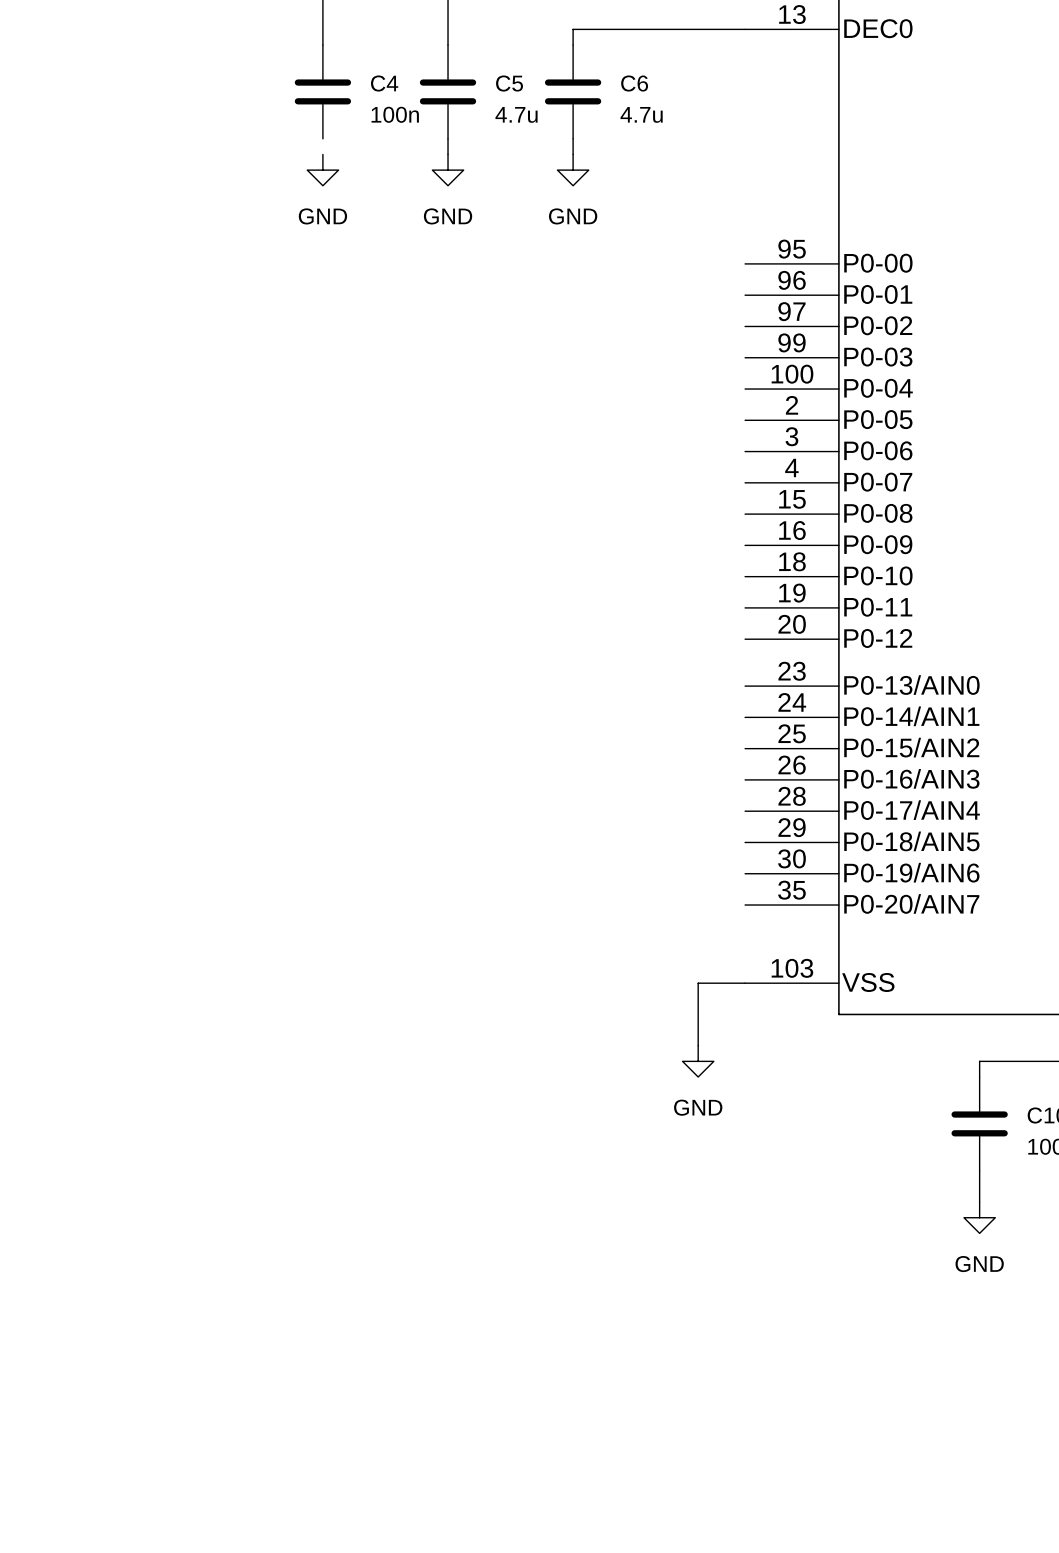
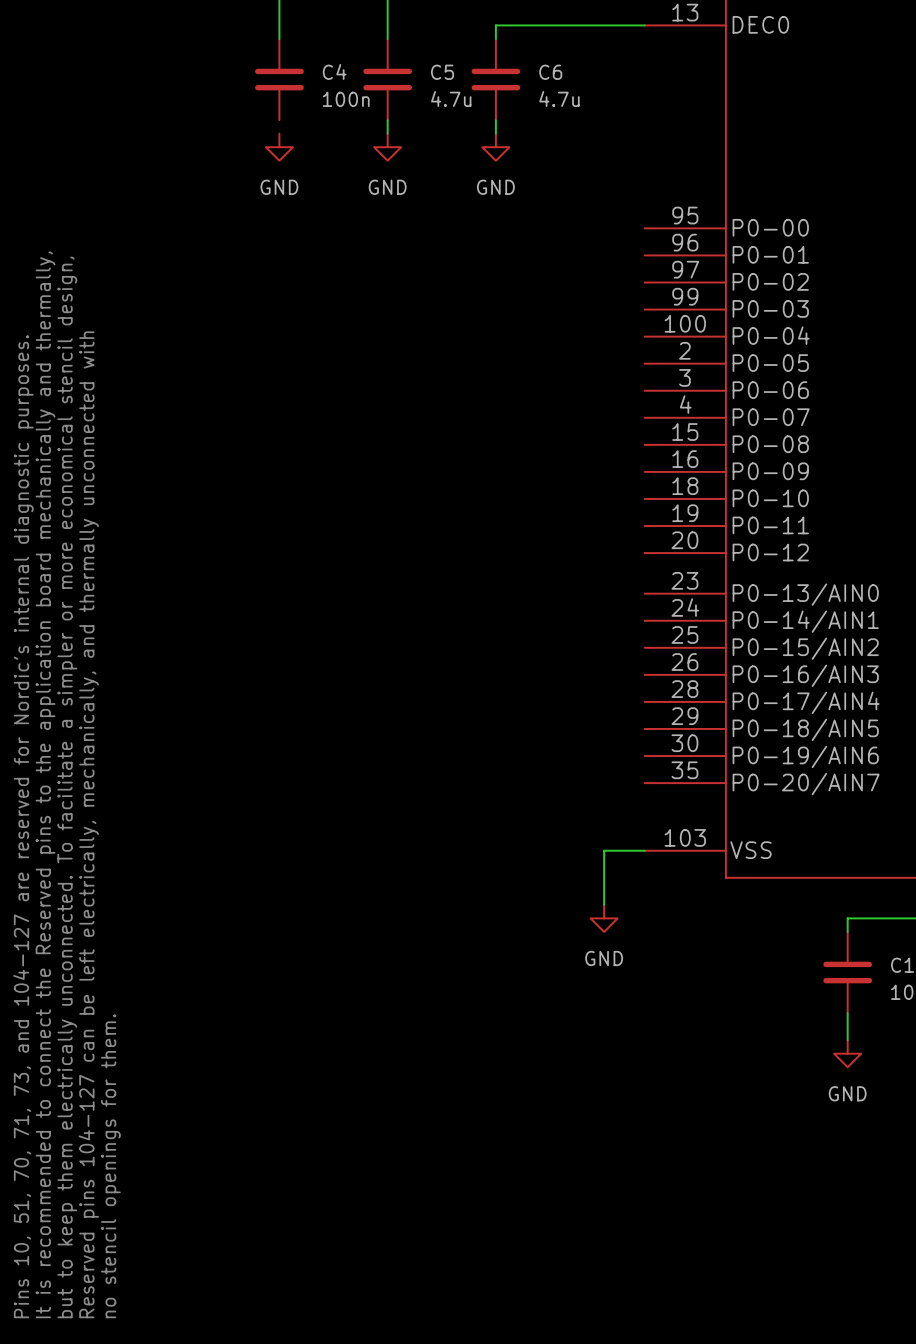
text: none -> It is recommended to connect the Reserved pins to the application board mechanically and thermally, (45, 784)
text: none -> but to keep them electrically unconnected. To facilitate a simpler or more economical stencil design, (67, 787)
text: none -> Reserved pins 104-127 can be left electrically, mechanically, and thermally unconnected with (88, 824)
text: none -> Pins 10, 51, 70, 71, 73, and 104-127 are reserved for Nordic's internal diagnostic purposes. (23, 826)
text: none -> no stencil openings for them. (110, 1166)

